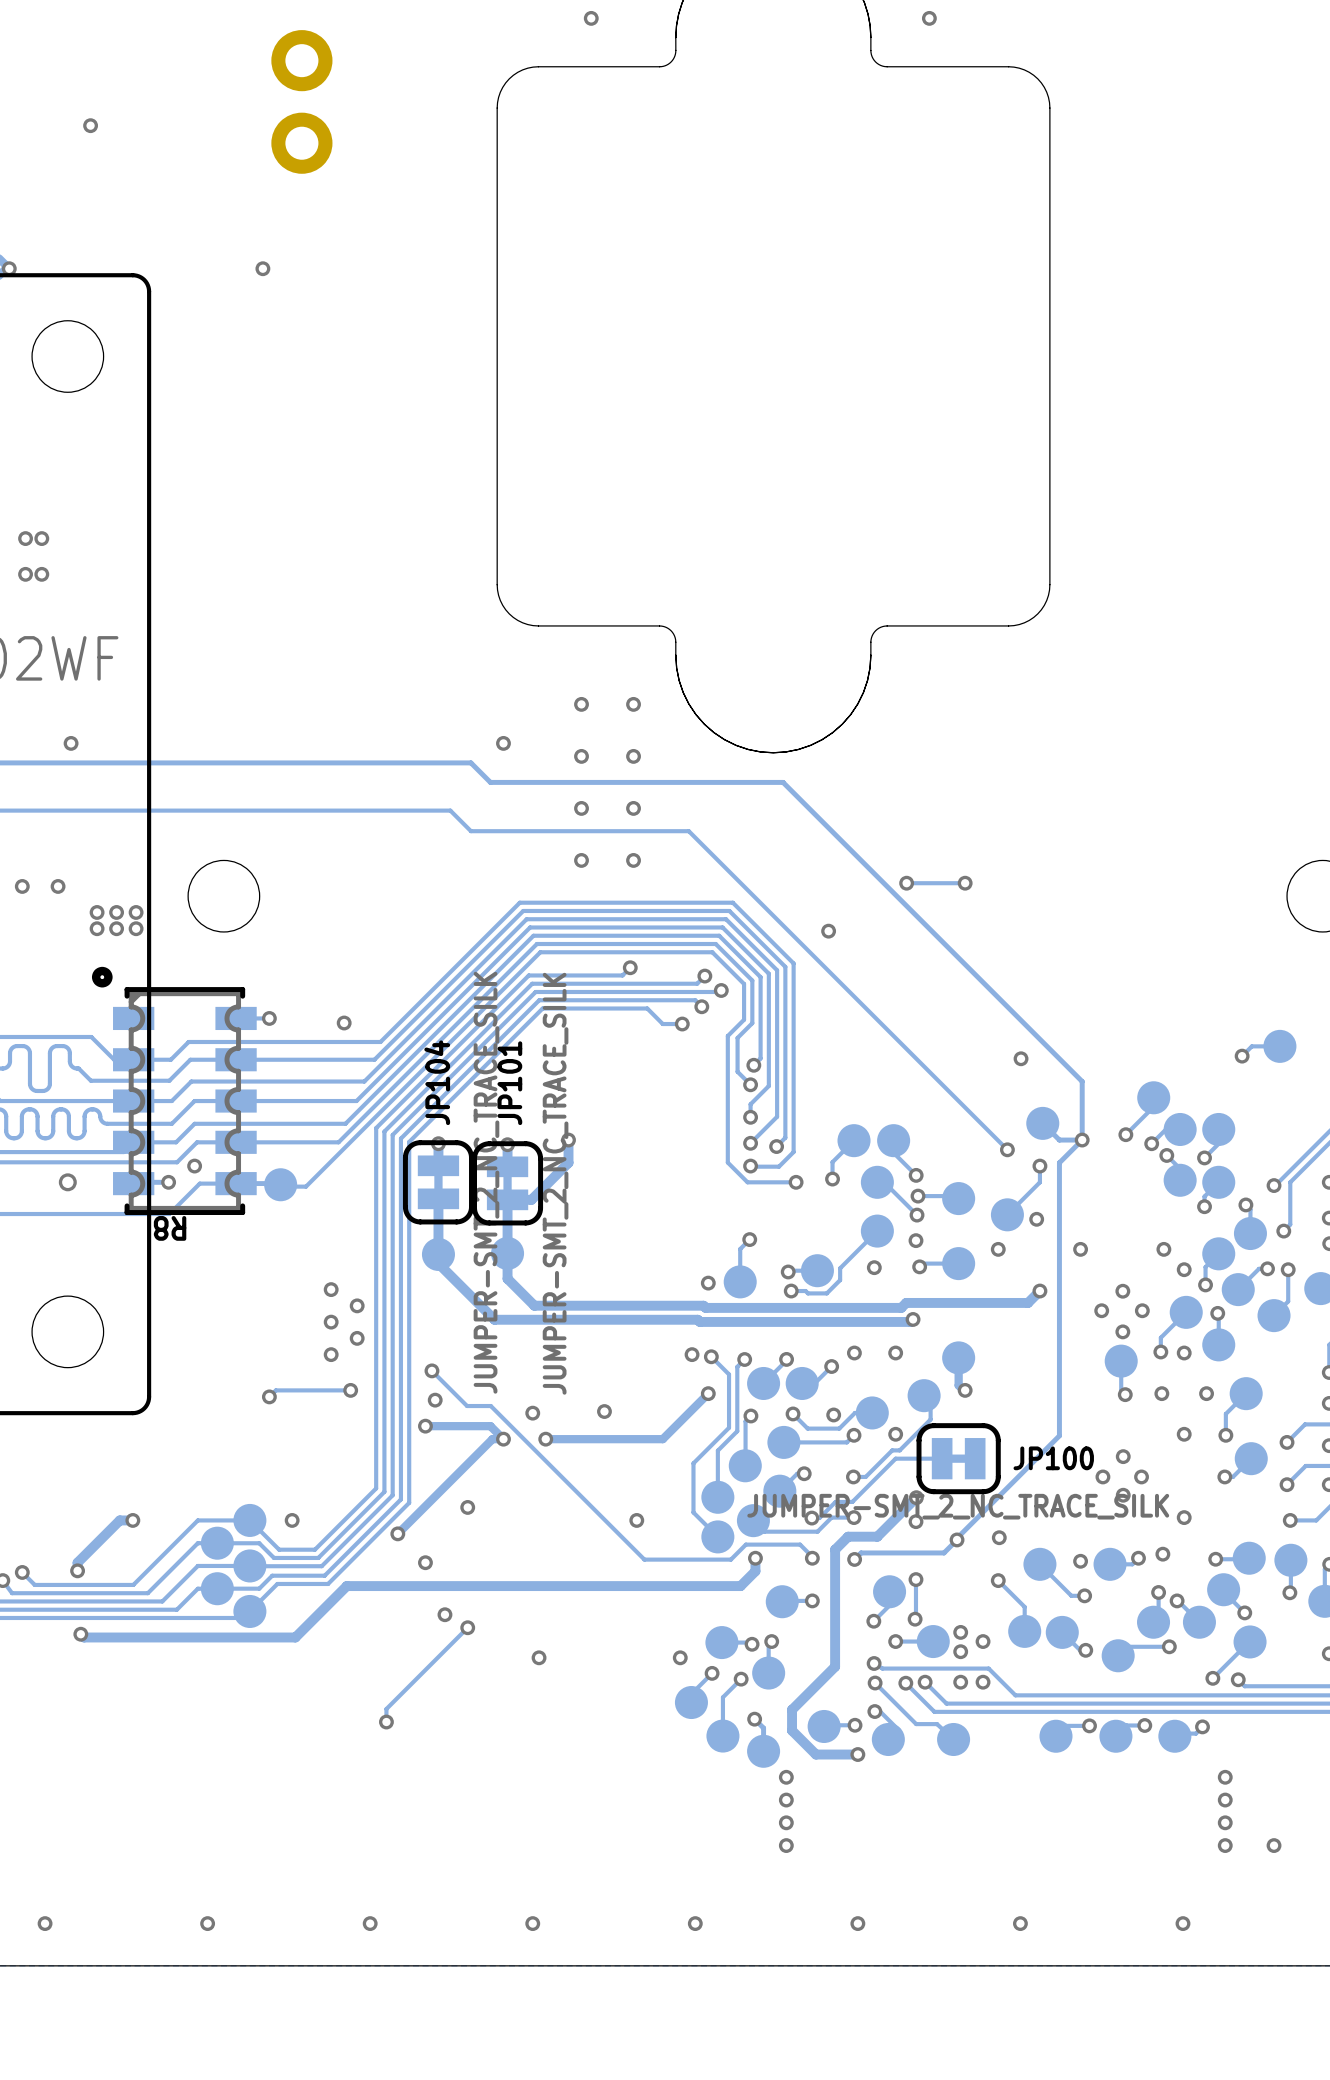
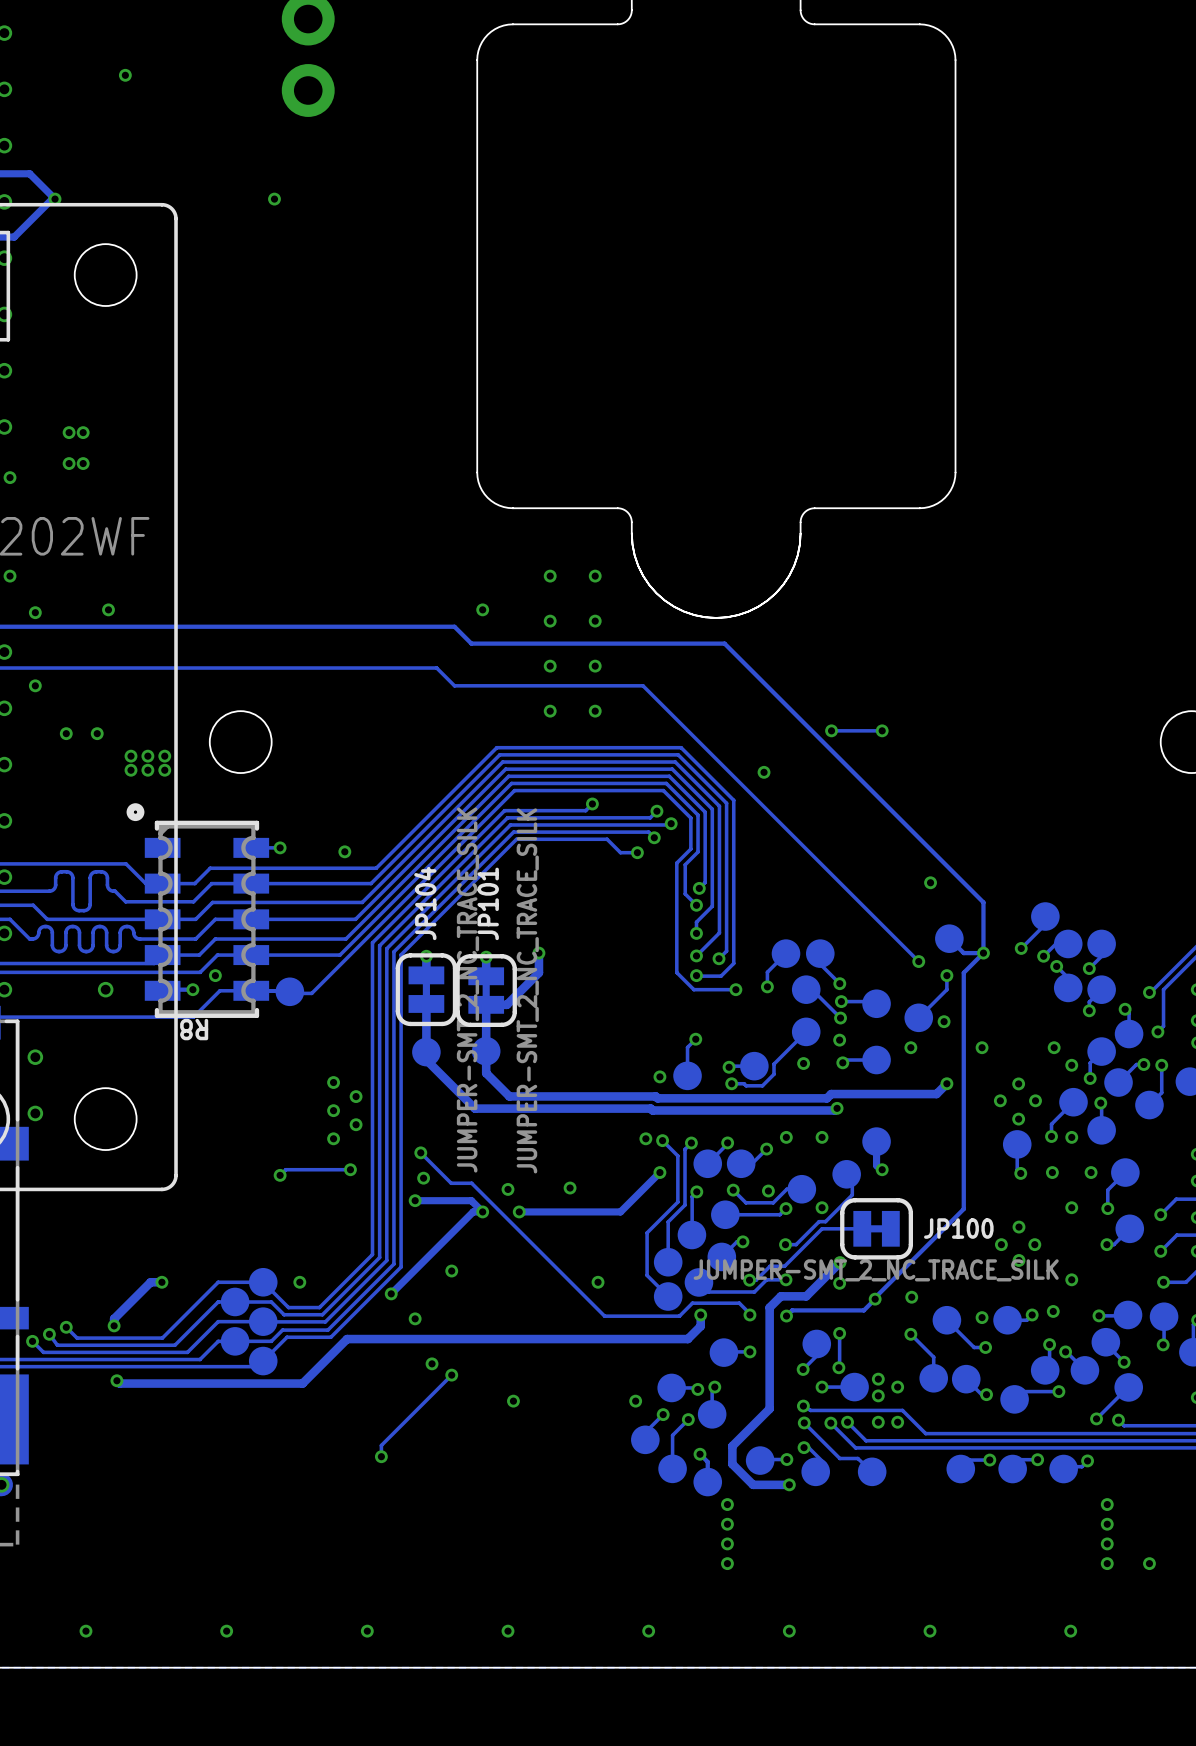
track: (1279, 1046) (1251, 1046) (1242, 1056) -> none
part: (1279, 1046) -> none
via: (1242, 1056) -> none

